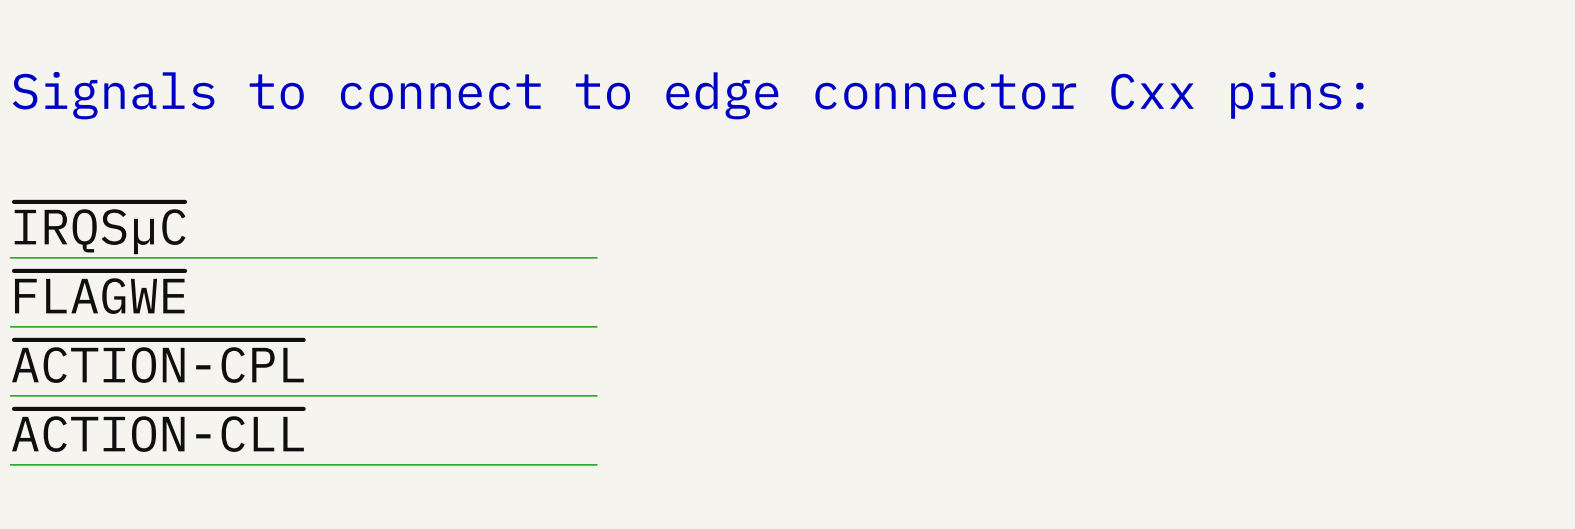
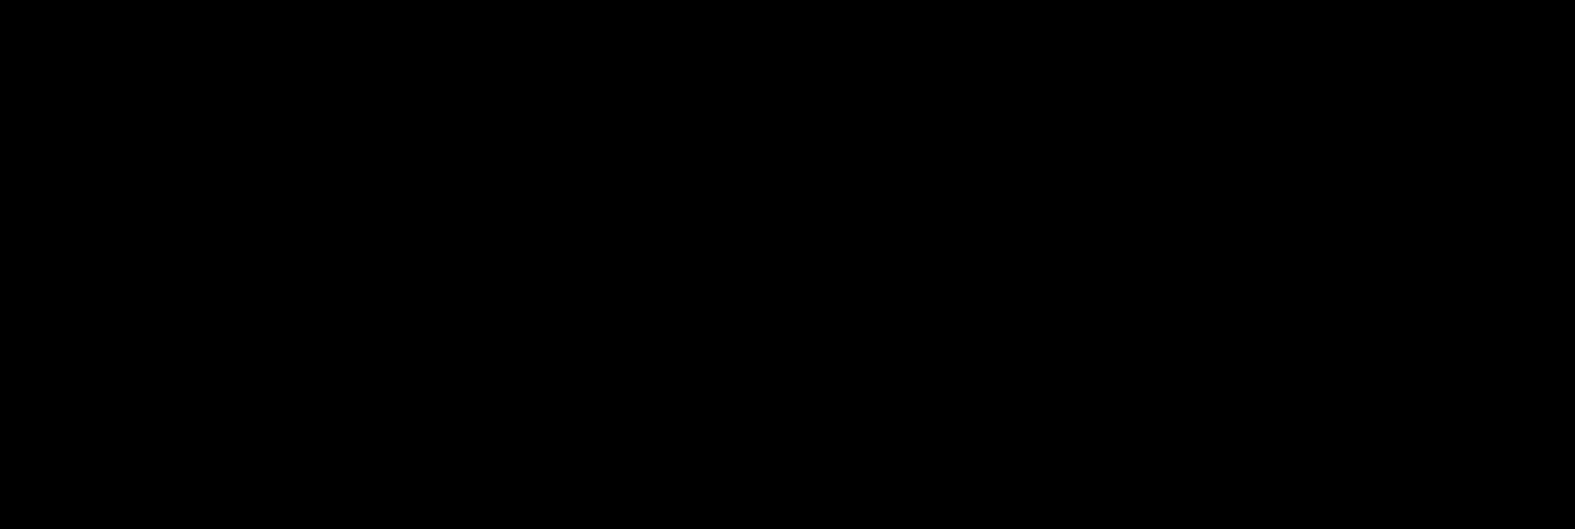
text: Signals to connect to edge connector Cxx pins: (688, 95) -> none
label: ~{IRQSµC} (99, 228) -> none
wire: (10, 257) (597, 257) -> none
label: ~{FLAGWE} (99, 292) -> none
wire: (10, 326) (597, 326) -> none
label: ~{ACTION-CPL} (157, 361) -> none
wire: (10, 395) (597, 395) -> none
label: ~{ACTION-CLL} (157, 430) -> none
wire: (10, 464) (597, 464) -> none

